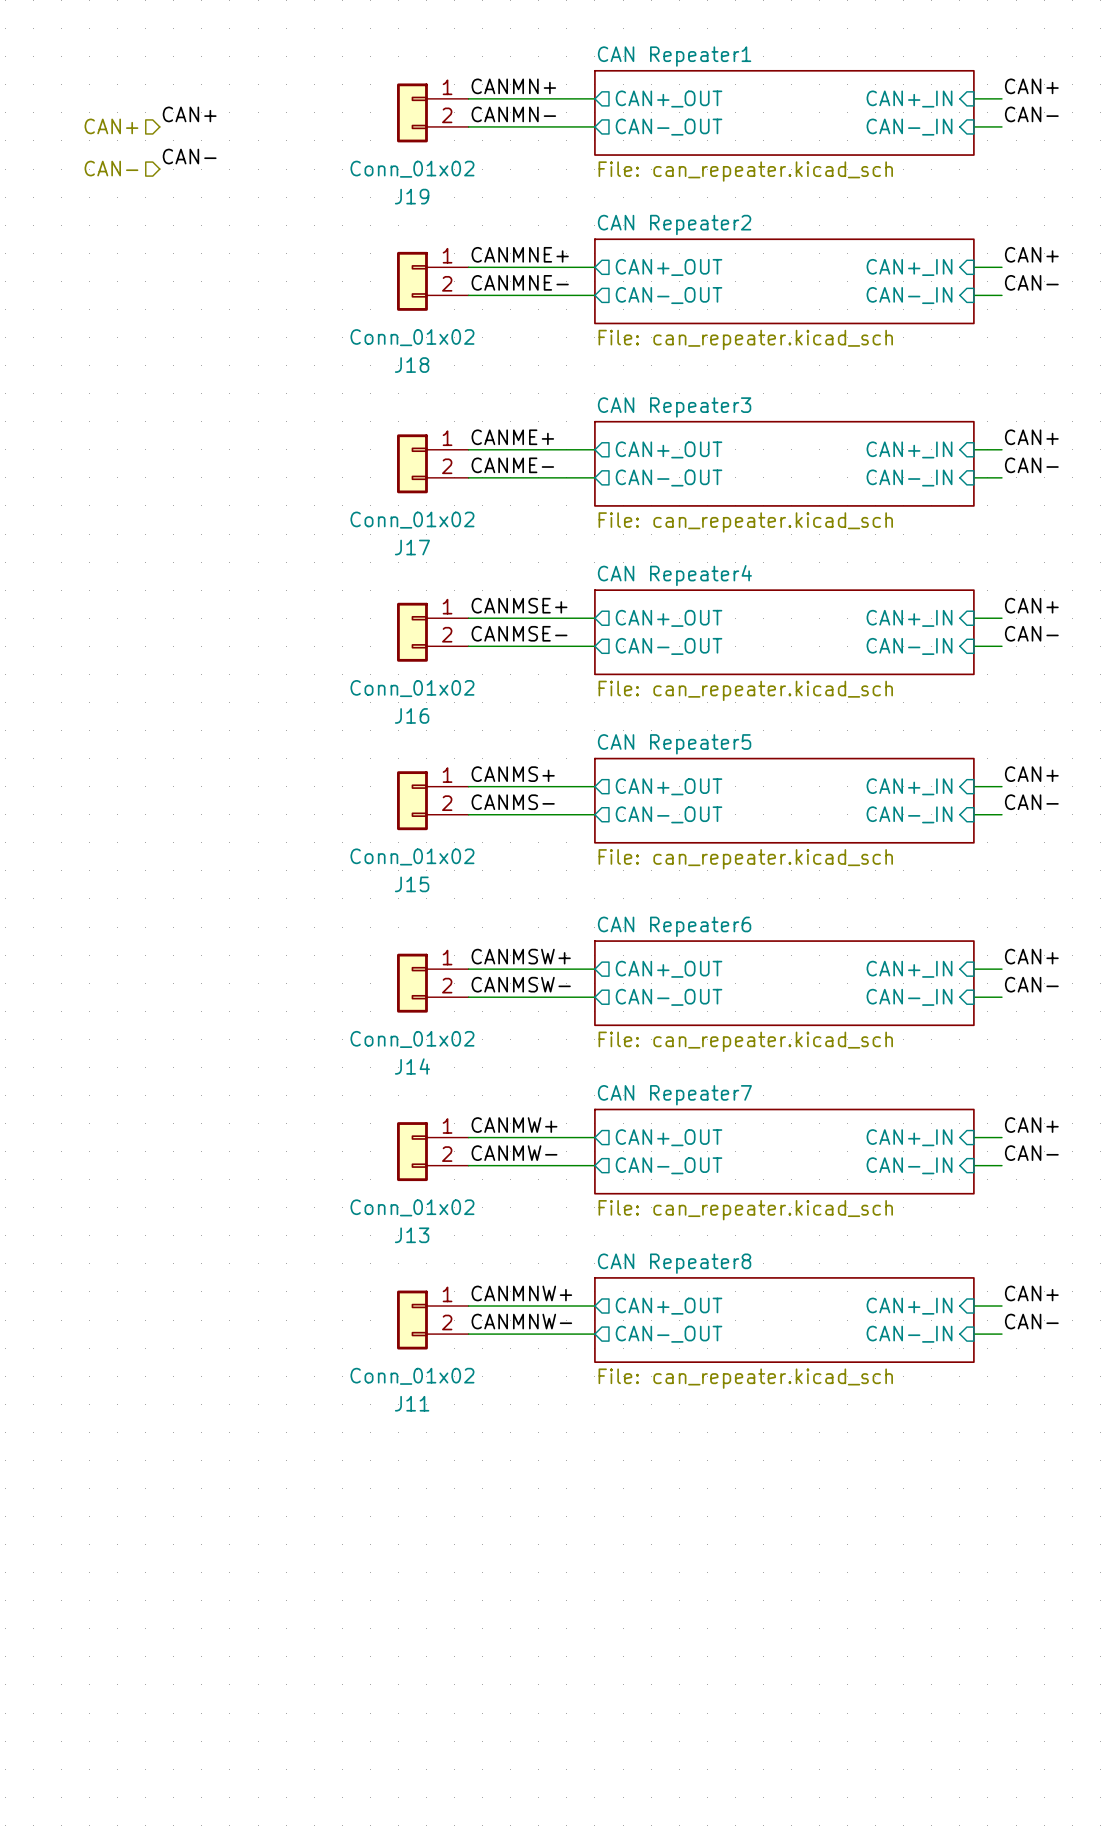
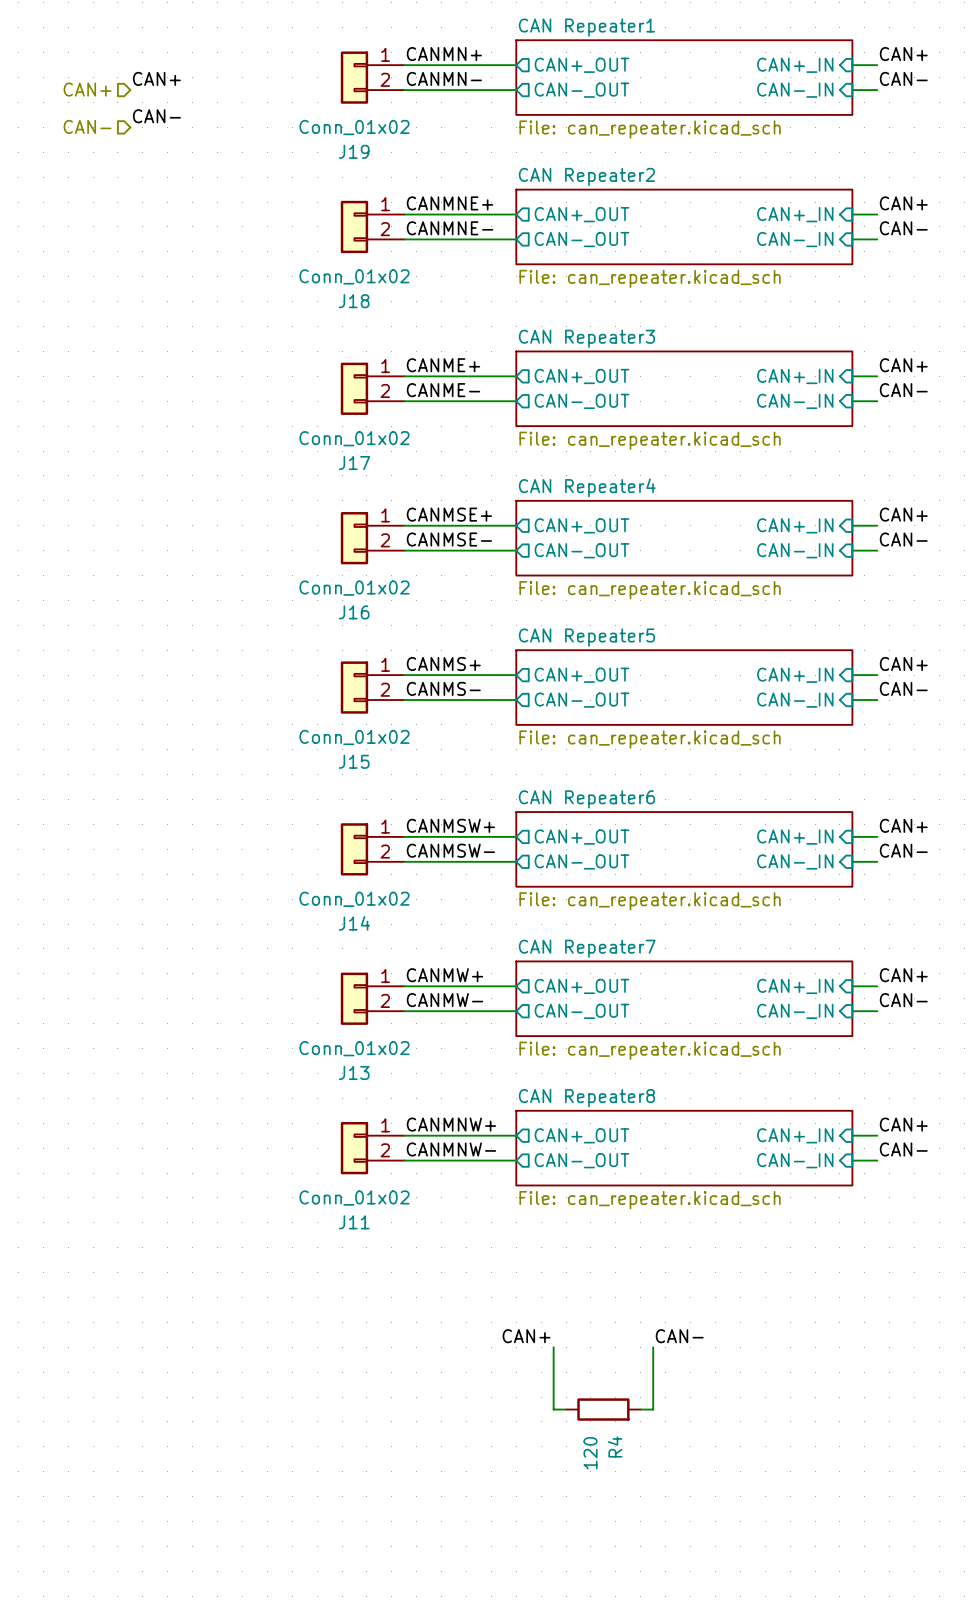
label: none -> CAN+ (526, 1336)
label: none -> CAN- (679, 1336)
wire: none -> (553, 1347) (553, 1409) (566, 1409)
wire: none -> (653, 1347) (653, 1409) (640, 1409)
R4: none -> 120 (603, 1409)

